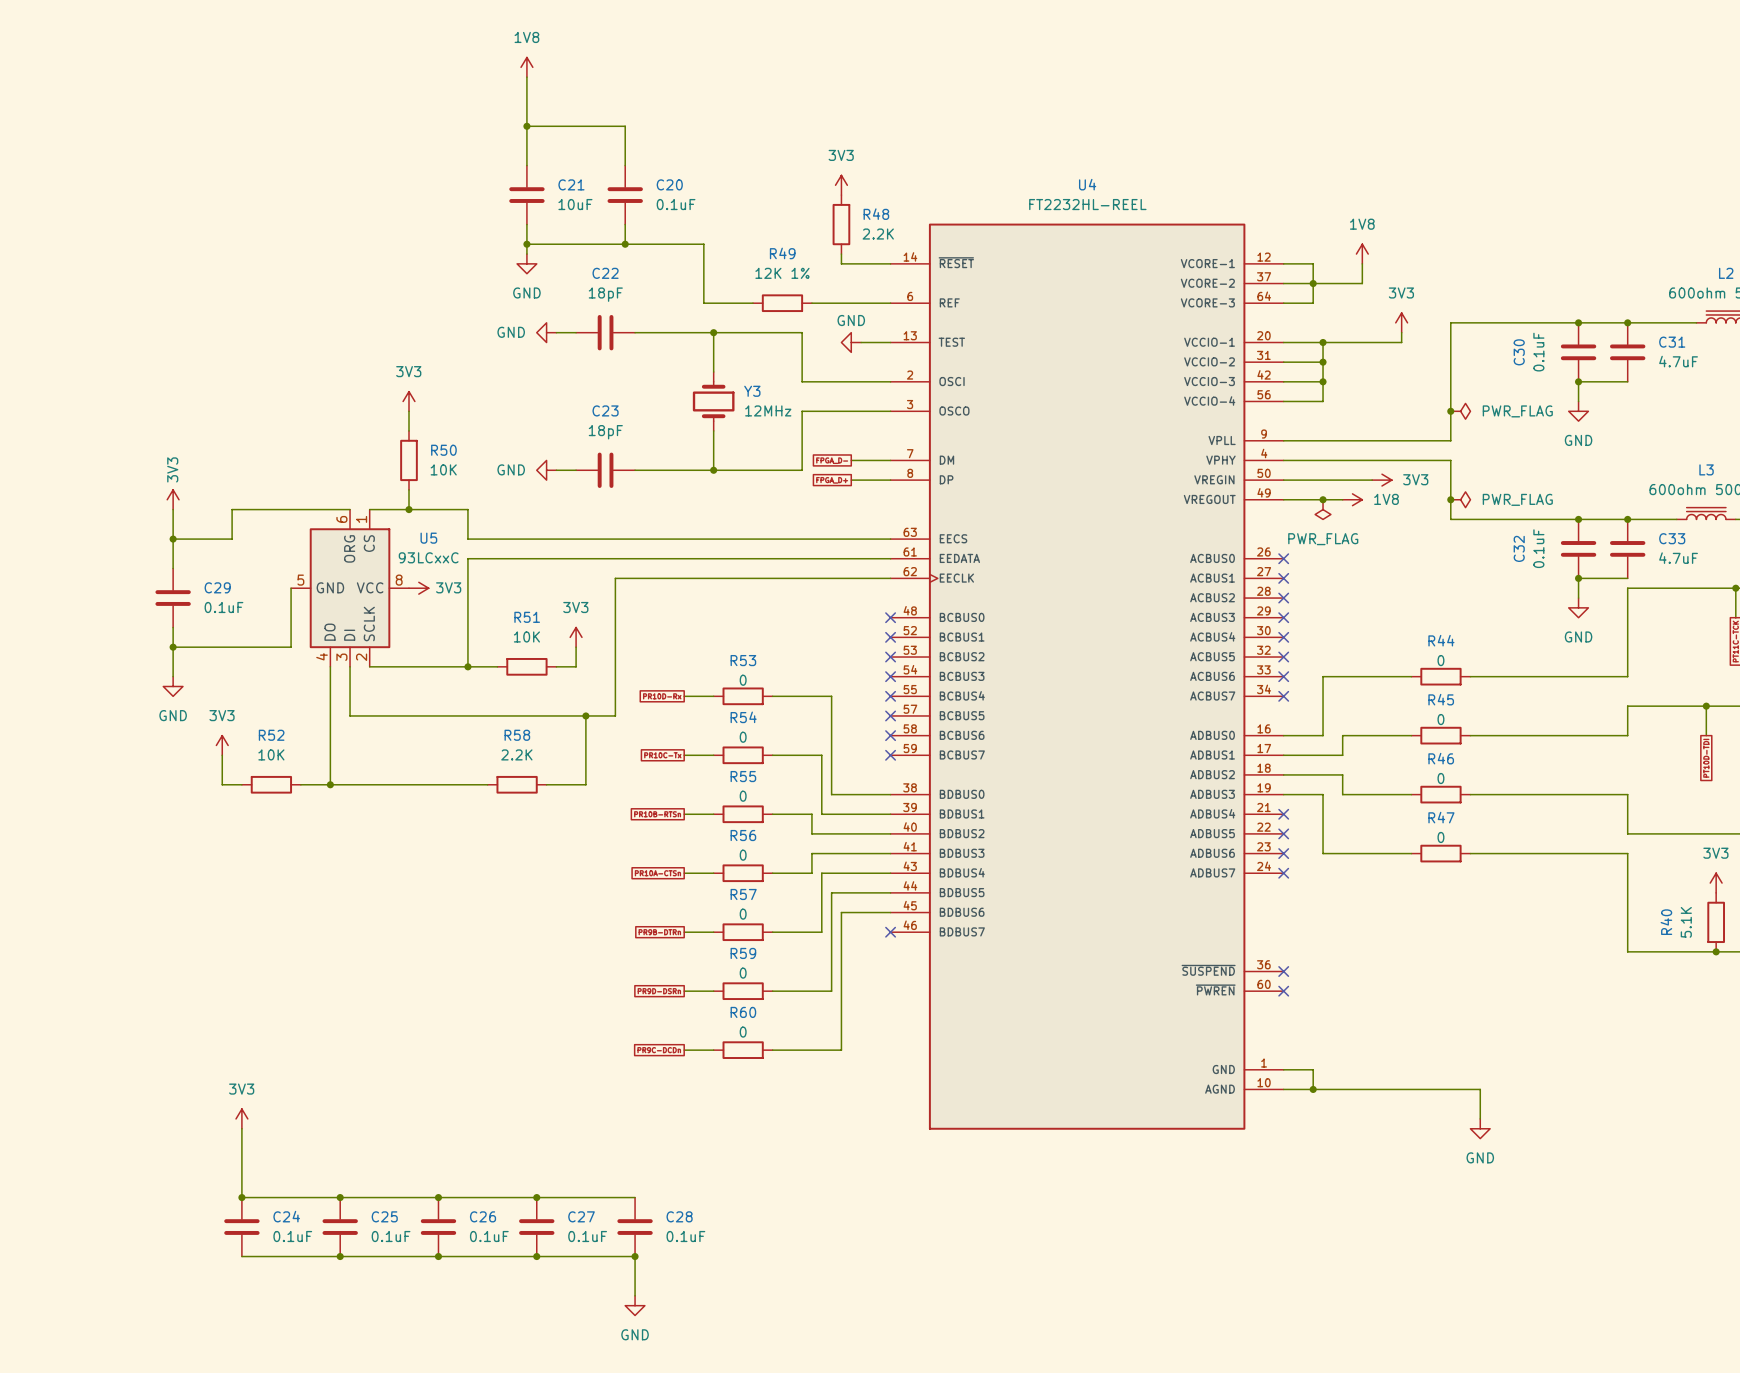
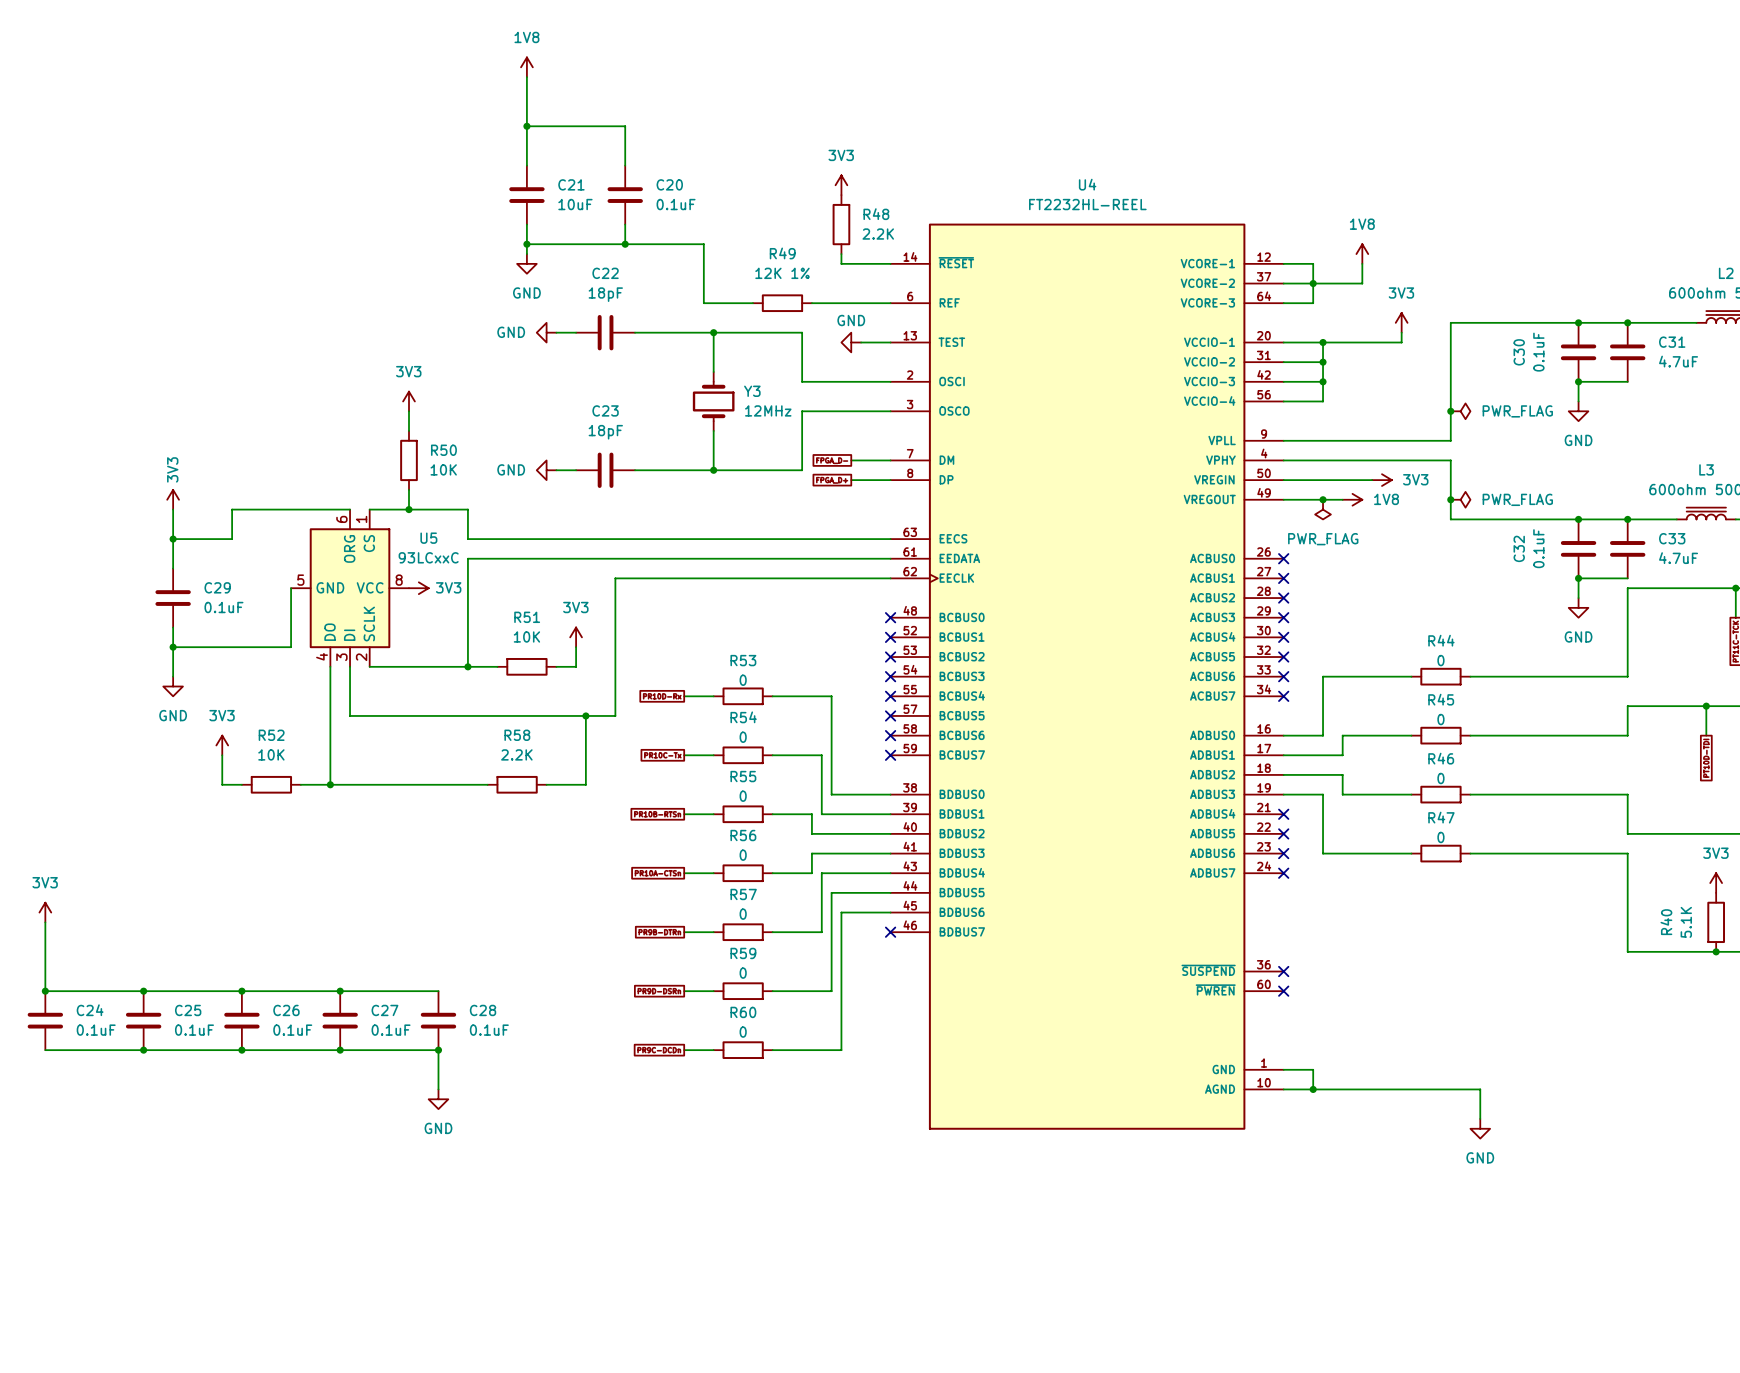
power symbol: none -> 3V3 (45, 912)
wire: none -> (45, 922) (45, 991) (438, 991)
junction: none -> (45, 991)
junction: none -> (143, 991)
junction: none -> (241, 991)
junction: none -> (340, 991)
wire: none -> (45, 1050) (438, 1050) (438, 1089)
junction: none -> (143, 1050)
junction: none -> (241, 1050)
junction: none -> (340, 1050)
junction: none -> (438, 1050)
power symbol: none -> GND (438, 1099)
power symbol: 3V3 (241, 1118) -> none
wire: (241, 1128) (241, 1197) (635, 1197) -> none
junction: (241, 1197) -> none
junction: (340, 1197) -> none
junction: (438, 1197) -> none
junction: (536, 1197) -> none
C24 position: (241, 1227) -> (45, 1020)
C25 position: (340, 1227) -> (143, 1020)
C26 position: (438, 1227) -> (241, 1020)
C27 position: (536, 1227) -> (340, 1020)
C28 position: (635, 1227) -> (438, 1020)
wire: (241, 1256) (635, 1256) (635, 1295) -> none
junction: (340, 1256) -> none
junction: (438, 1256) -> none
junction: (536, 1256) -> none
junction: (635, 1256) -> none
power symbol: GND (635, 1305) -> none

